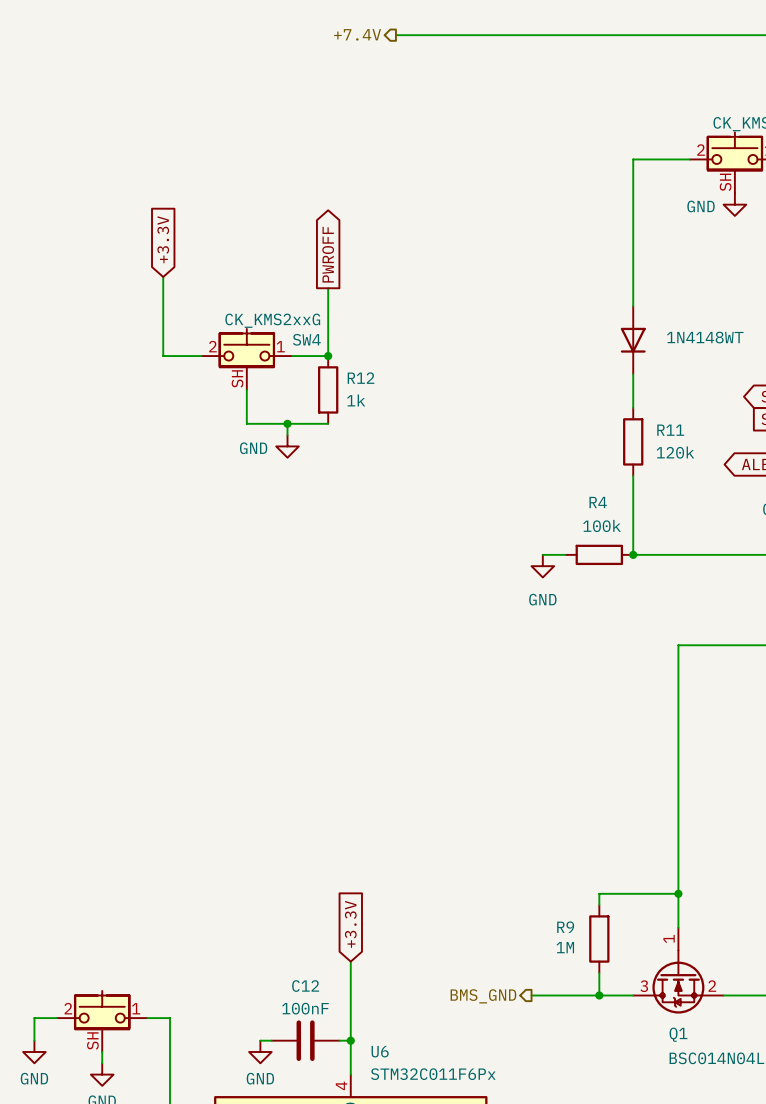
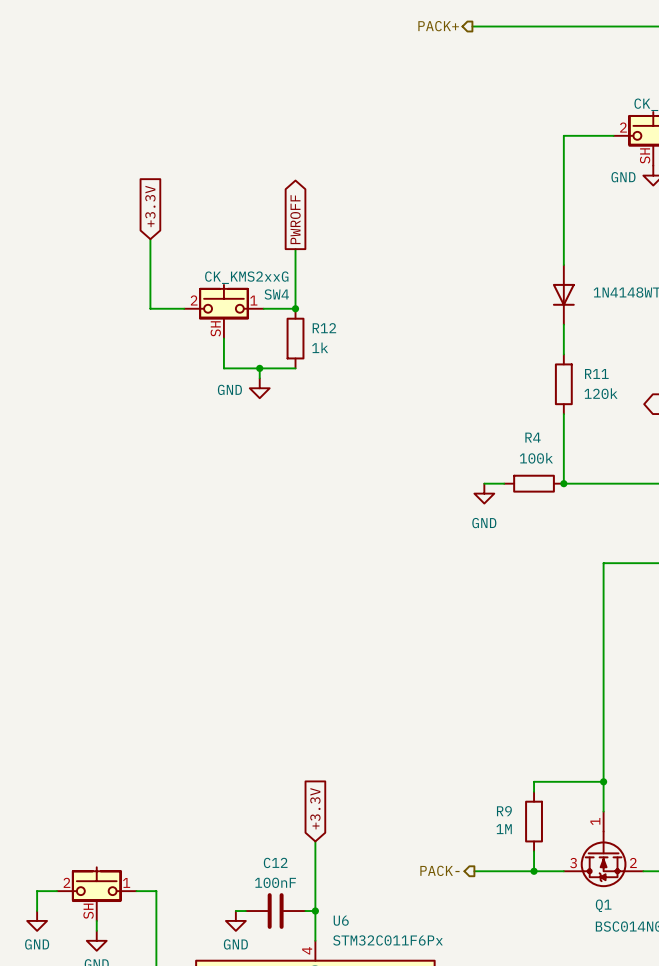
hierarchical label: +7.4V (357, 34) -> none
hierarchical label: none -> PACK+ (438, 26)
wire: (395, 35) (529, 35) -> none
hierarchical label: BMS_GND (483, 996) -> PACK- (439, 870)

